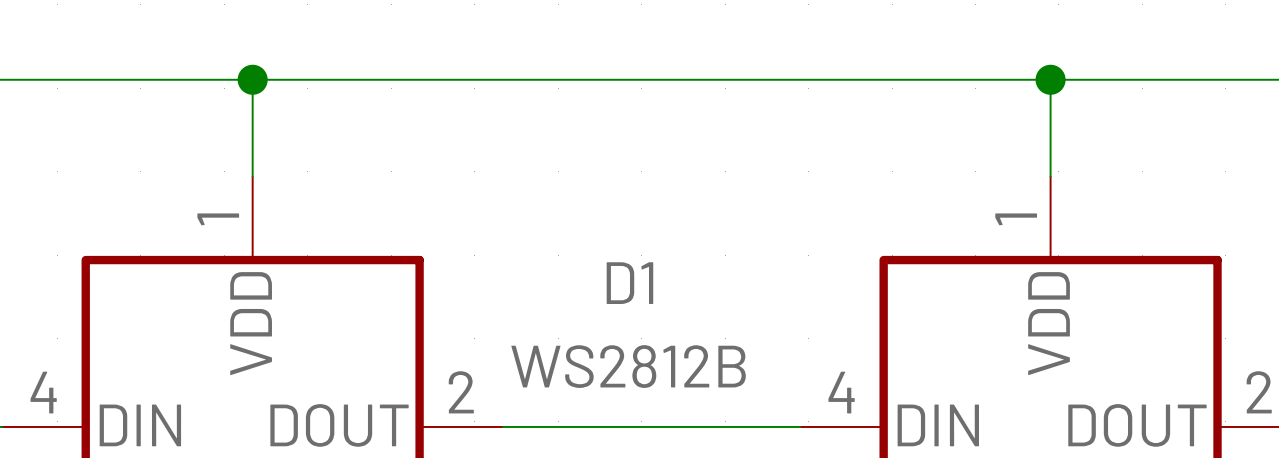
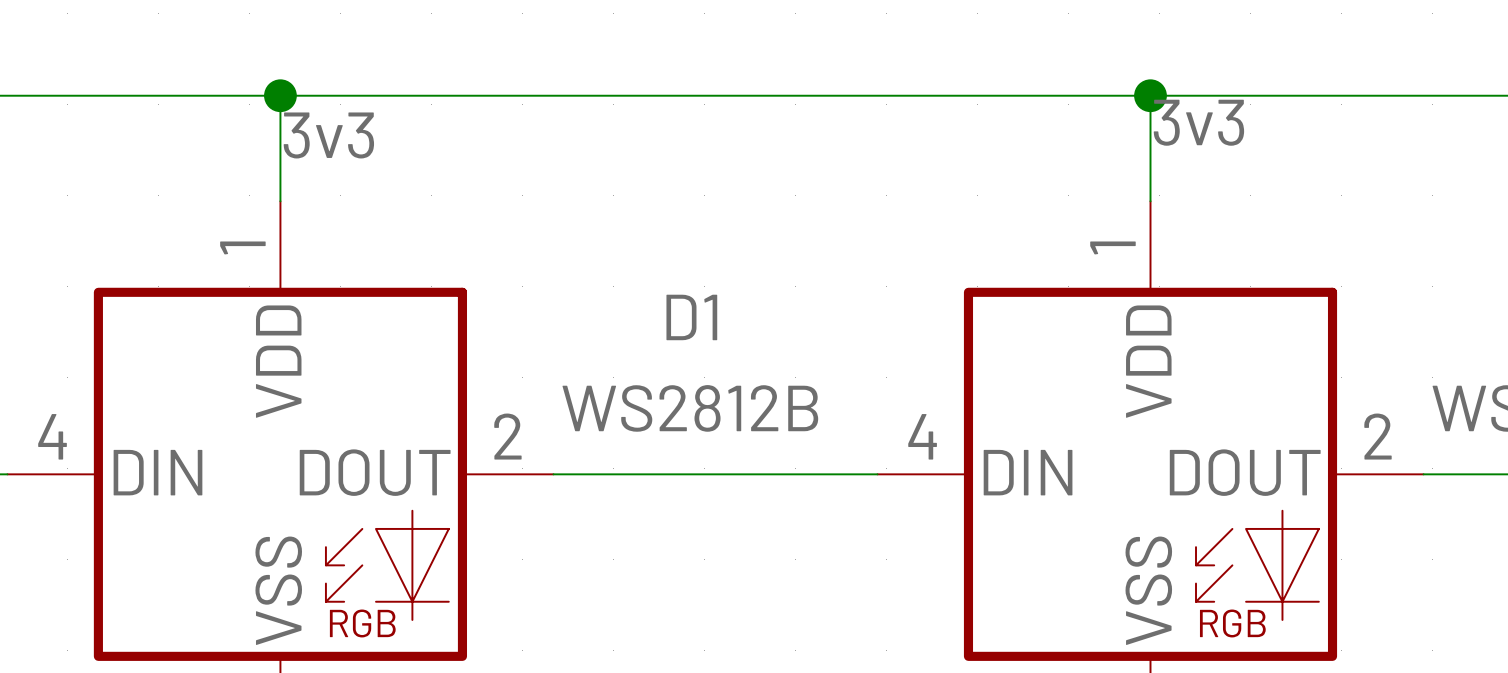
label: none -> 3v3 (1198, 122)
label: none -> 3v3 (328, 135)

